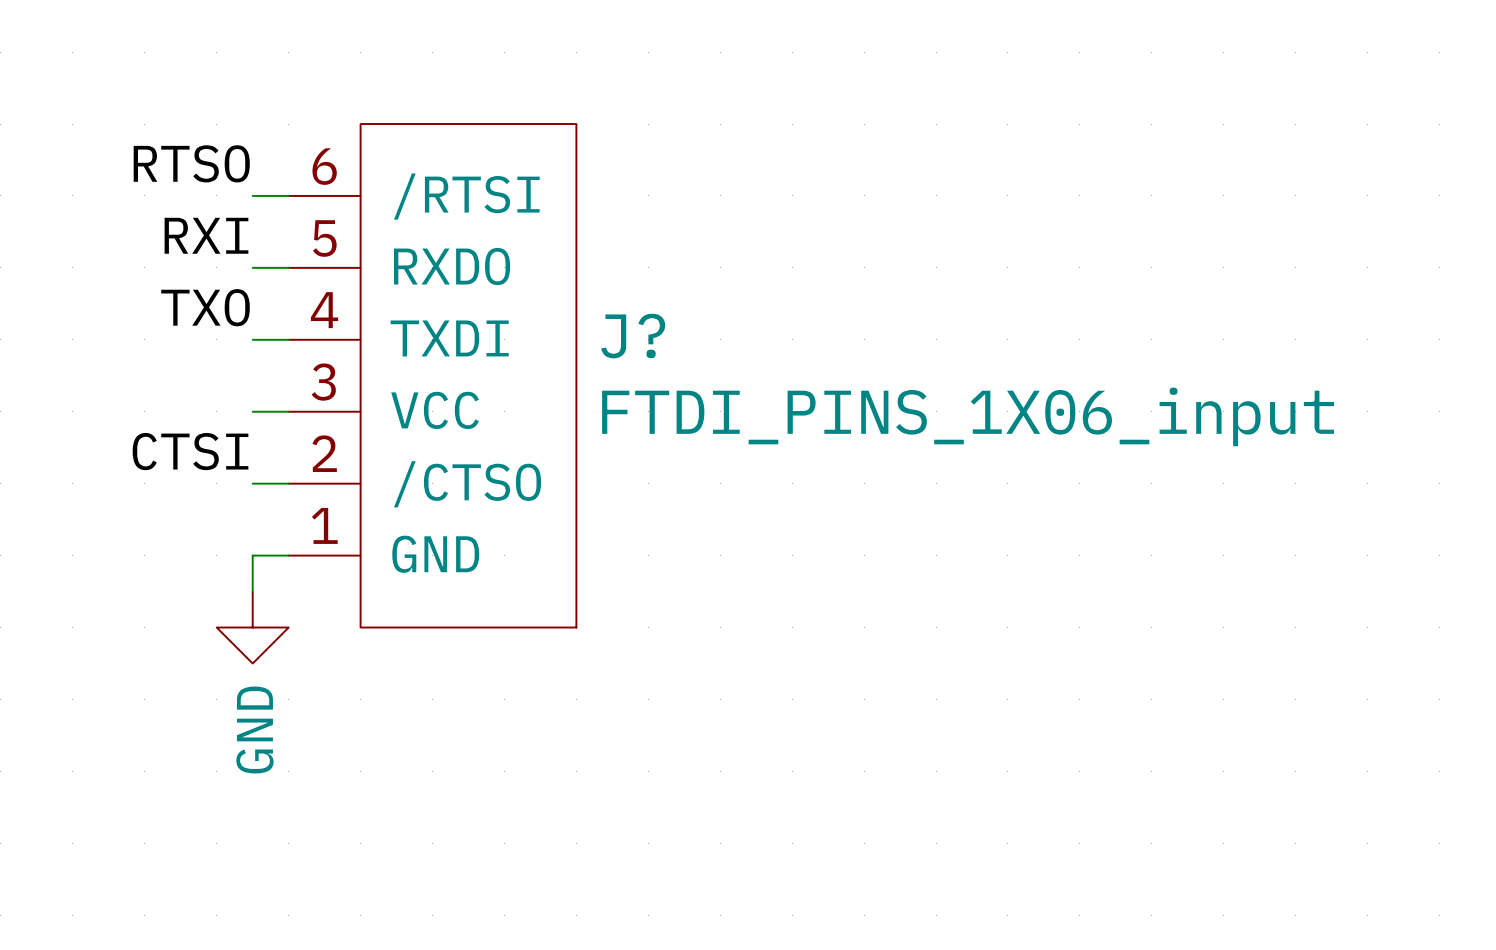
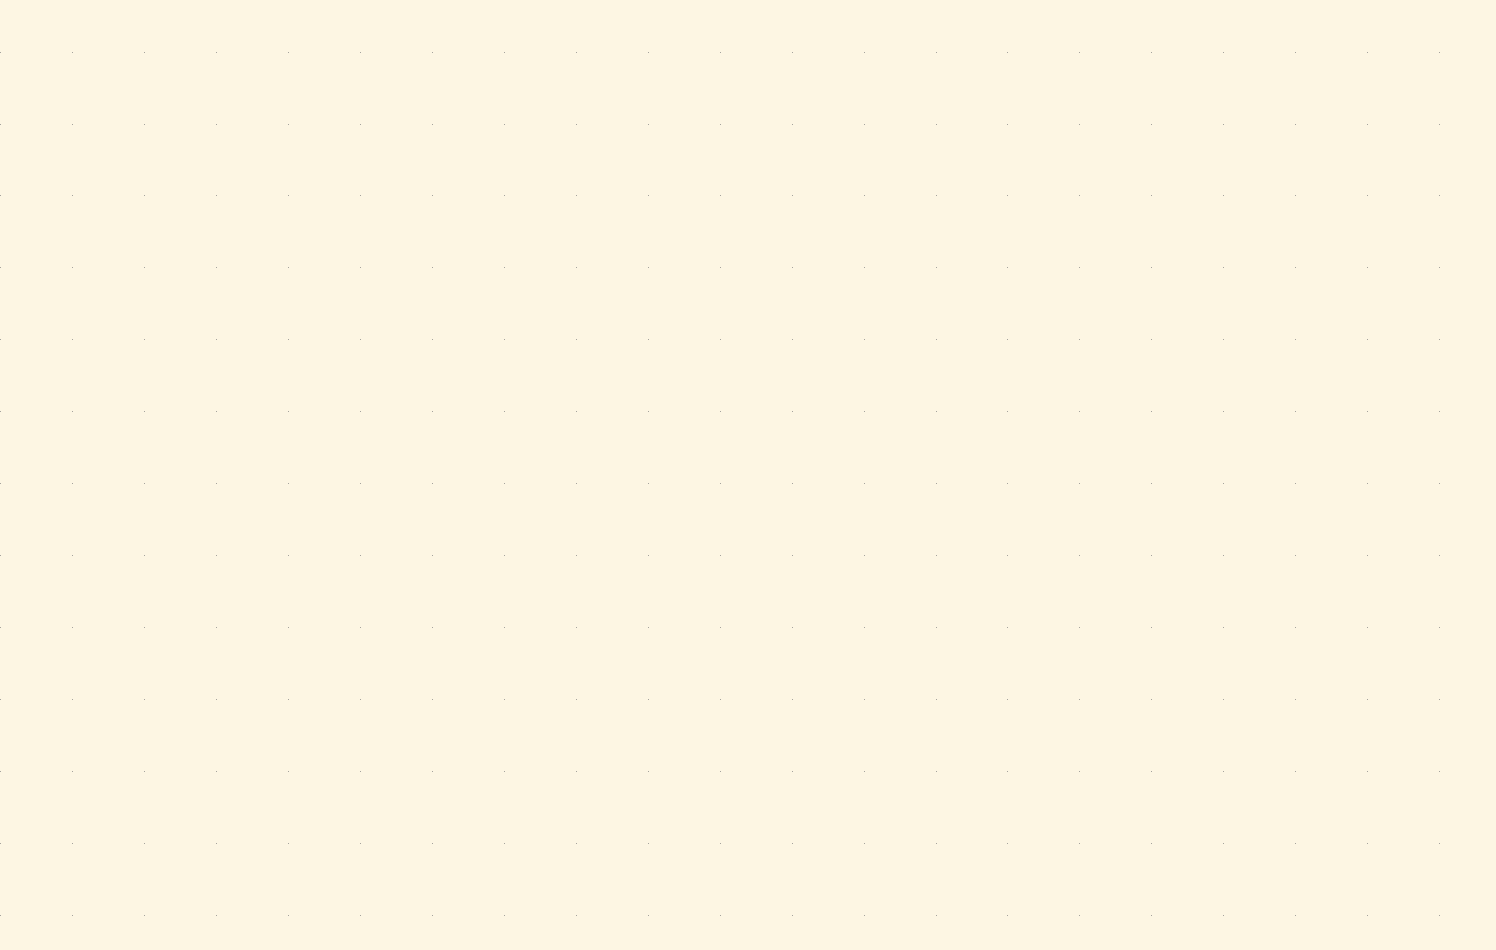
label: RTSO (191, 163) -> none
wire: (252, 195) (288, 195) -> none
label: RXI (206, 235) -> none
wire: (252, 267) (288, 267) -> none
label: TXO (205, 307) -> none
wire: (252, 339) (288, 339) -> none
J?: FTDI_PINS_1X06_input (432, 375) -> none
wire: (252, 411) (288, 411) -> none
label: CTSI (190, 451) -> none
wire: (252, 483) (288, 483) -> none
wire: (288, 555) (252, 555) (252, 591) -> none
power symbol: GND (252, 627) -> none

